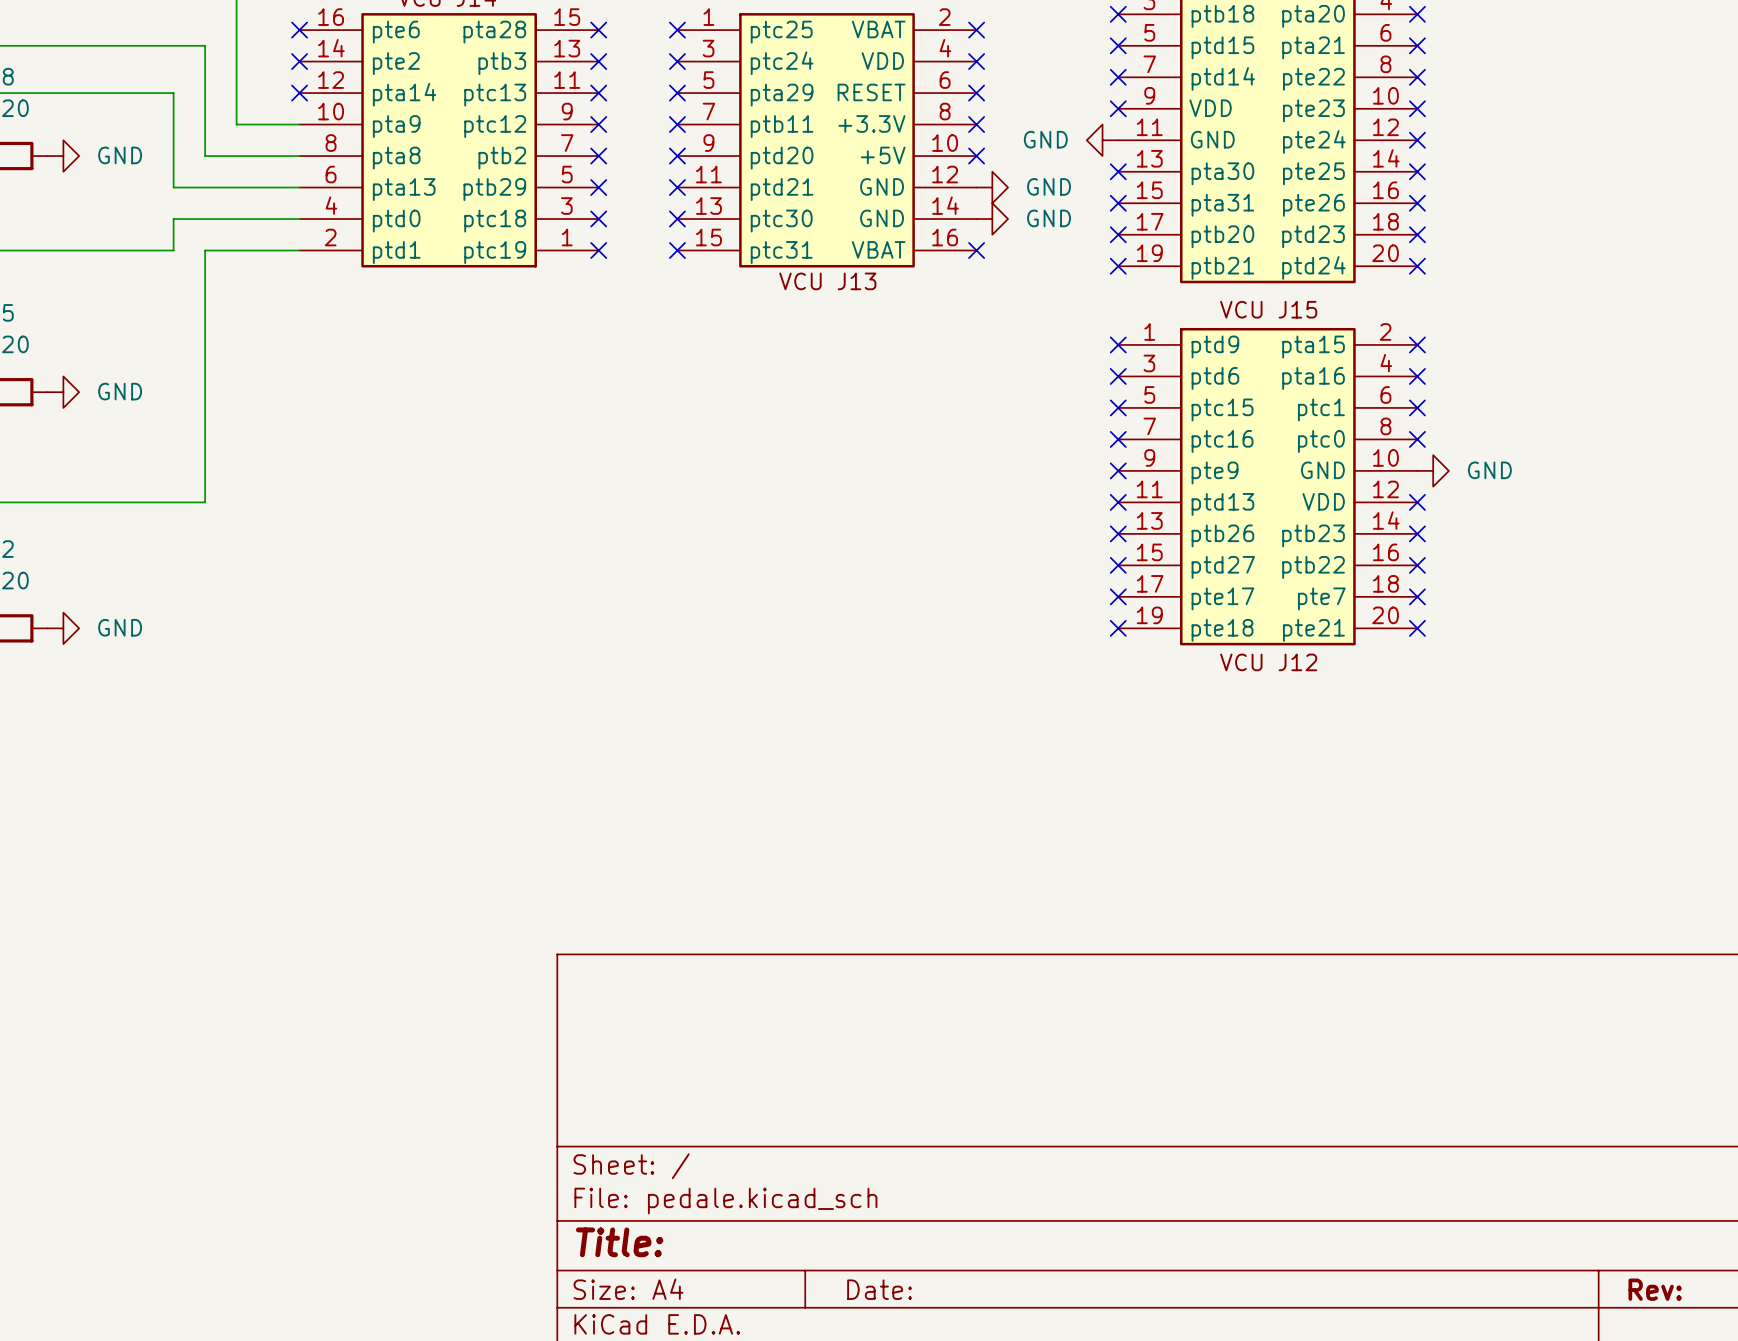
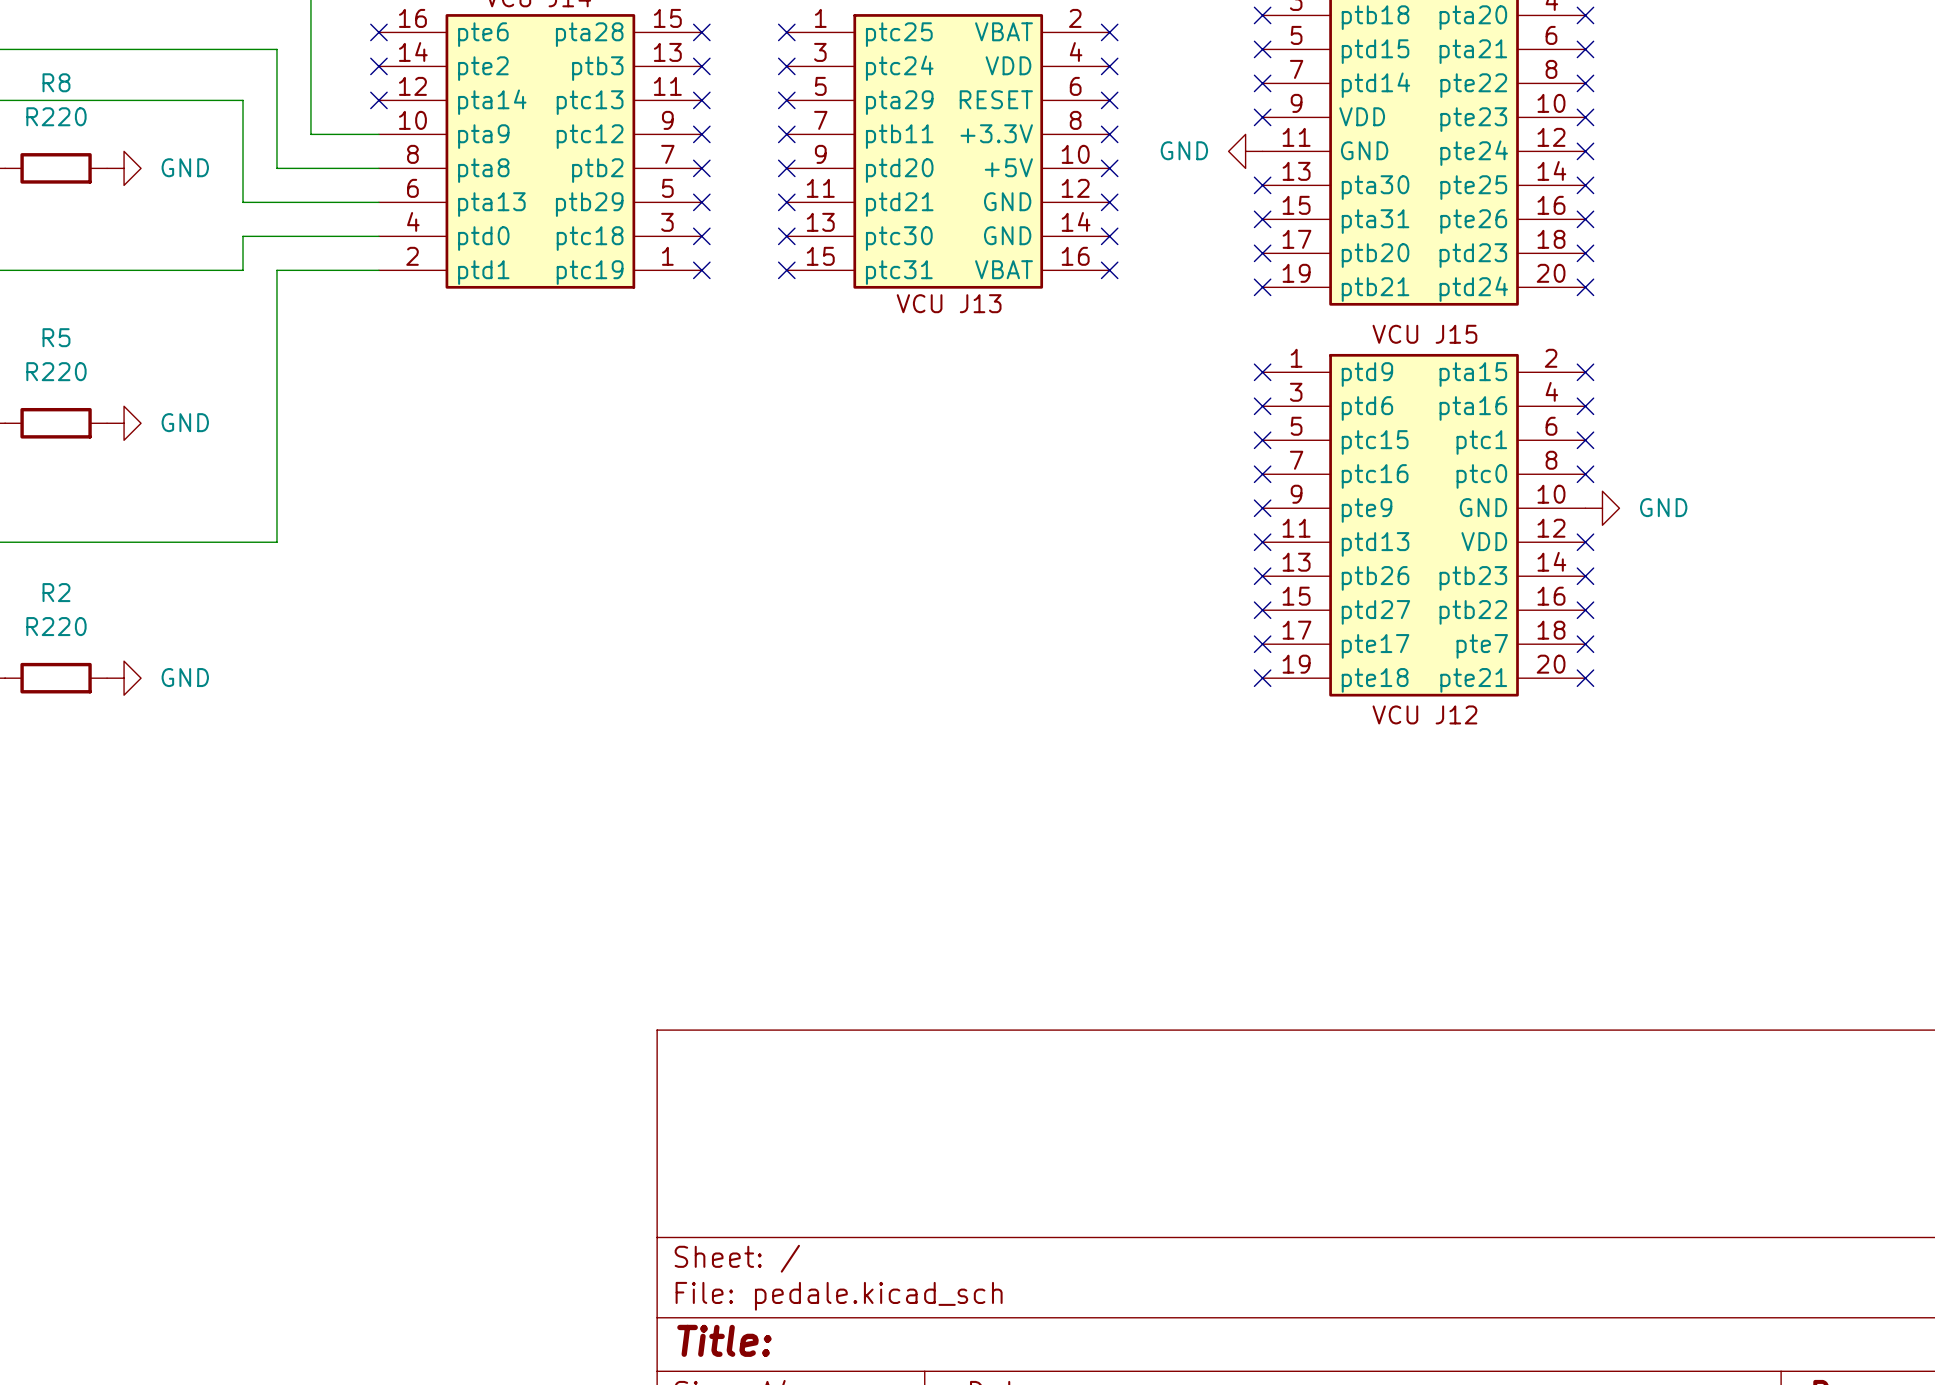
no-connect mark: none -> (1109, 202)
power symbol: GND (992, 187) -> none
no-connect mark: none -> (1109, 236)
power symbol: GND (992, 219) -> none

